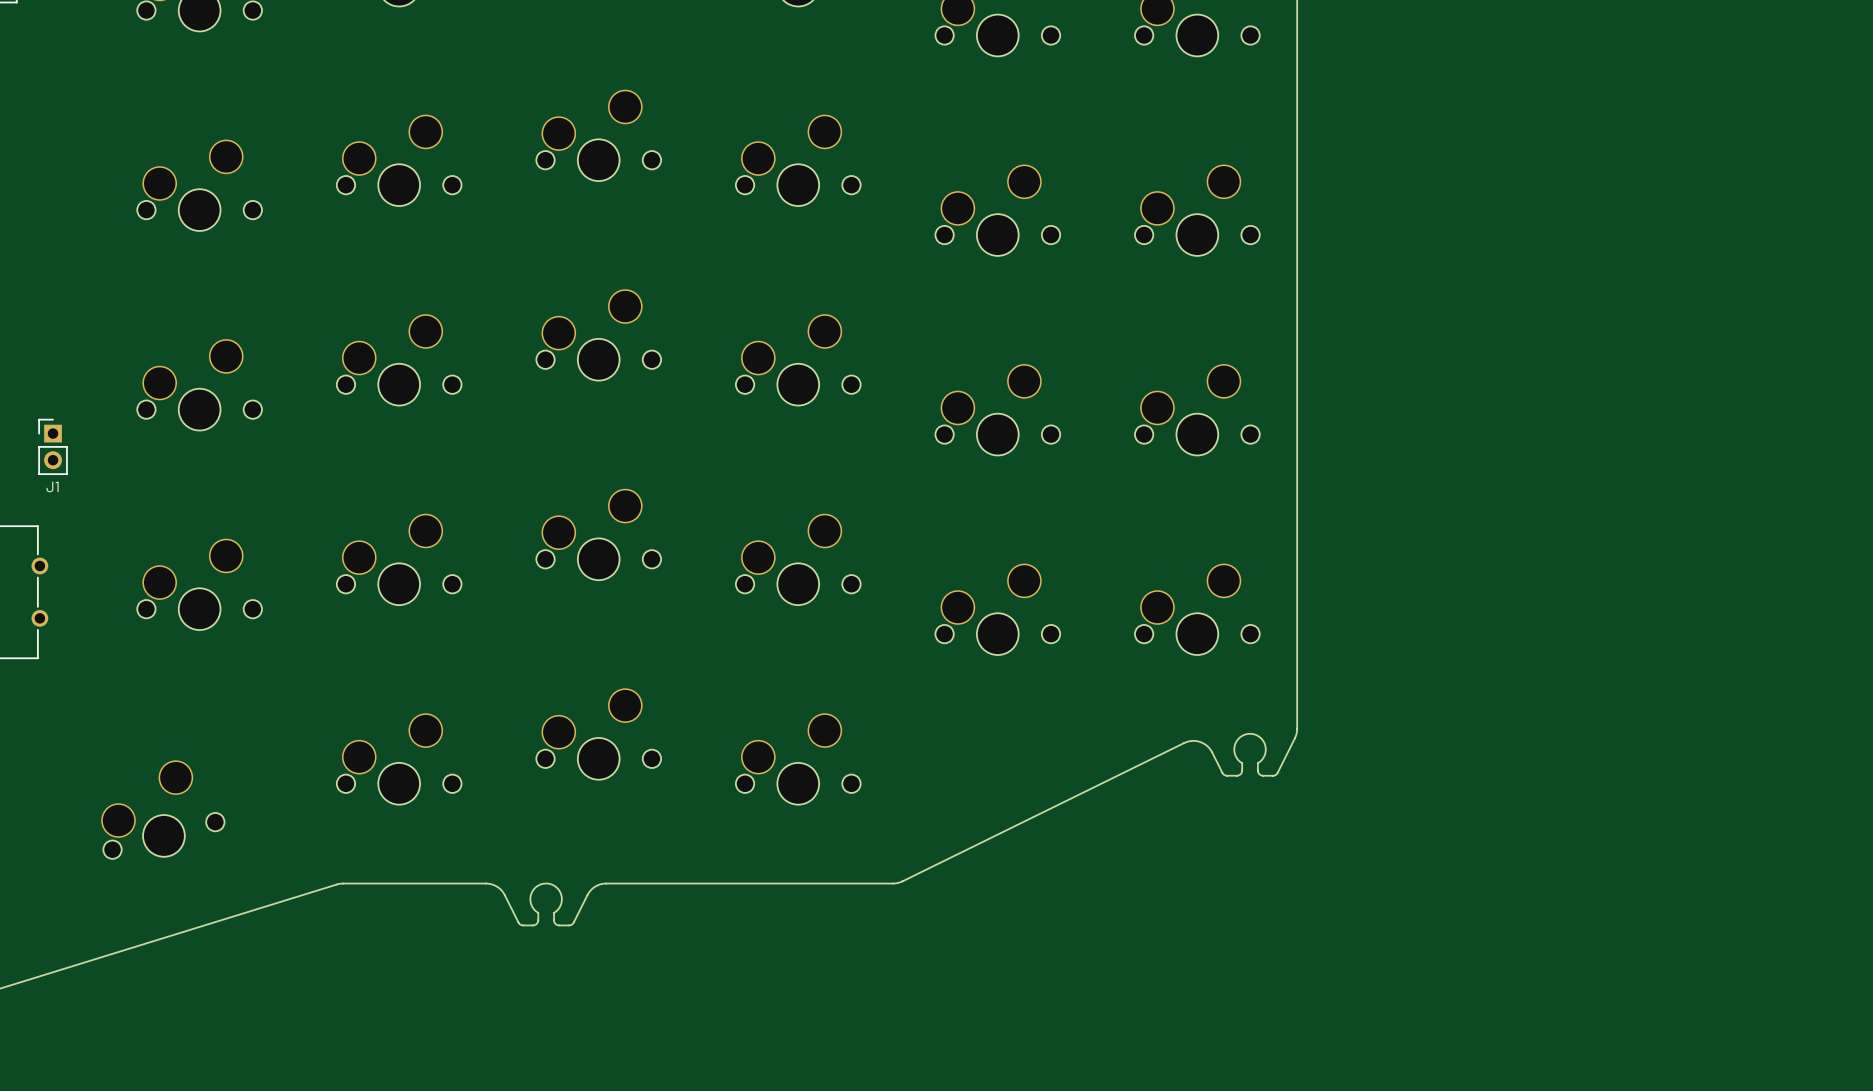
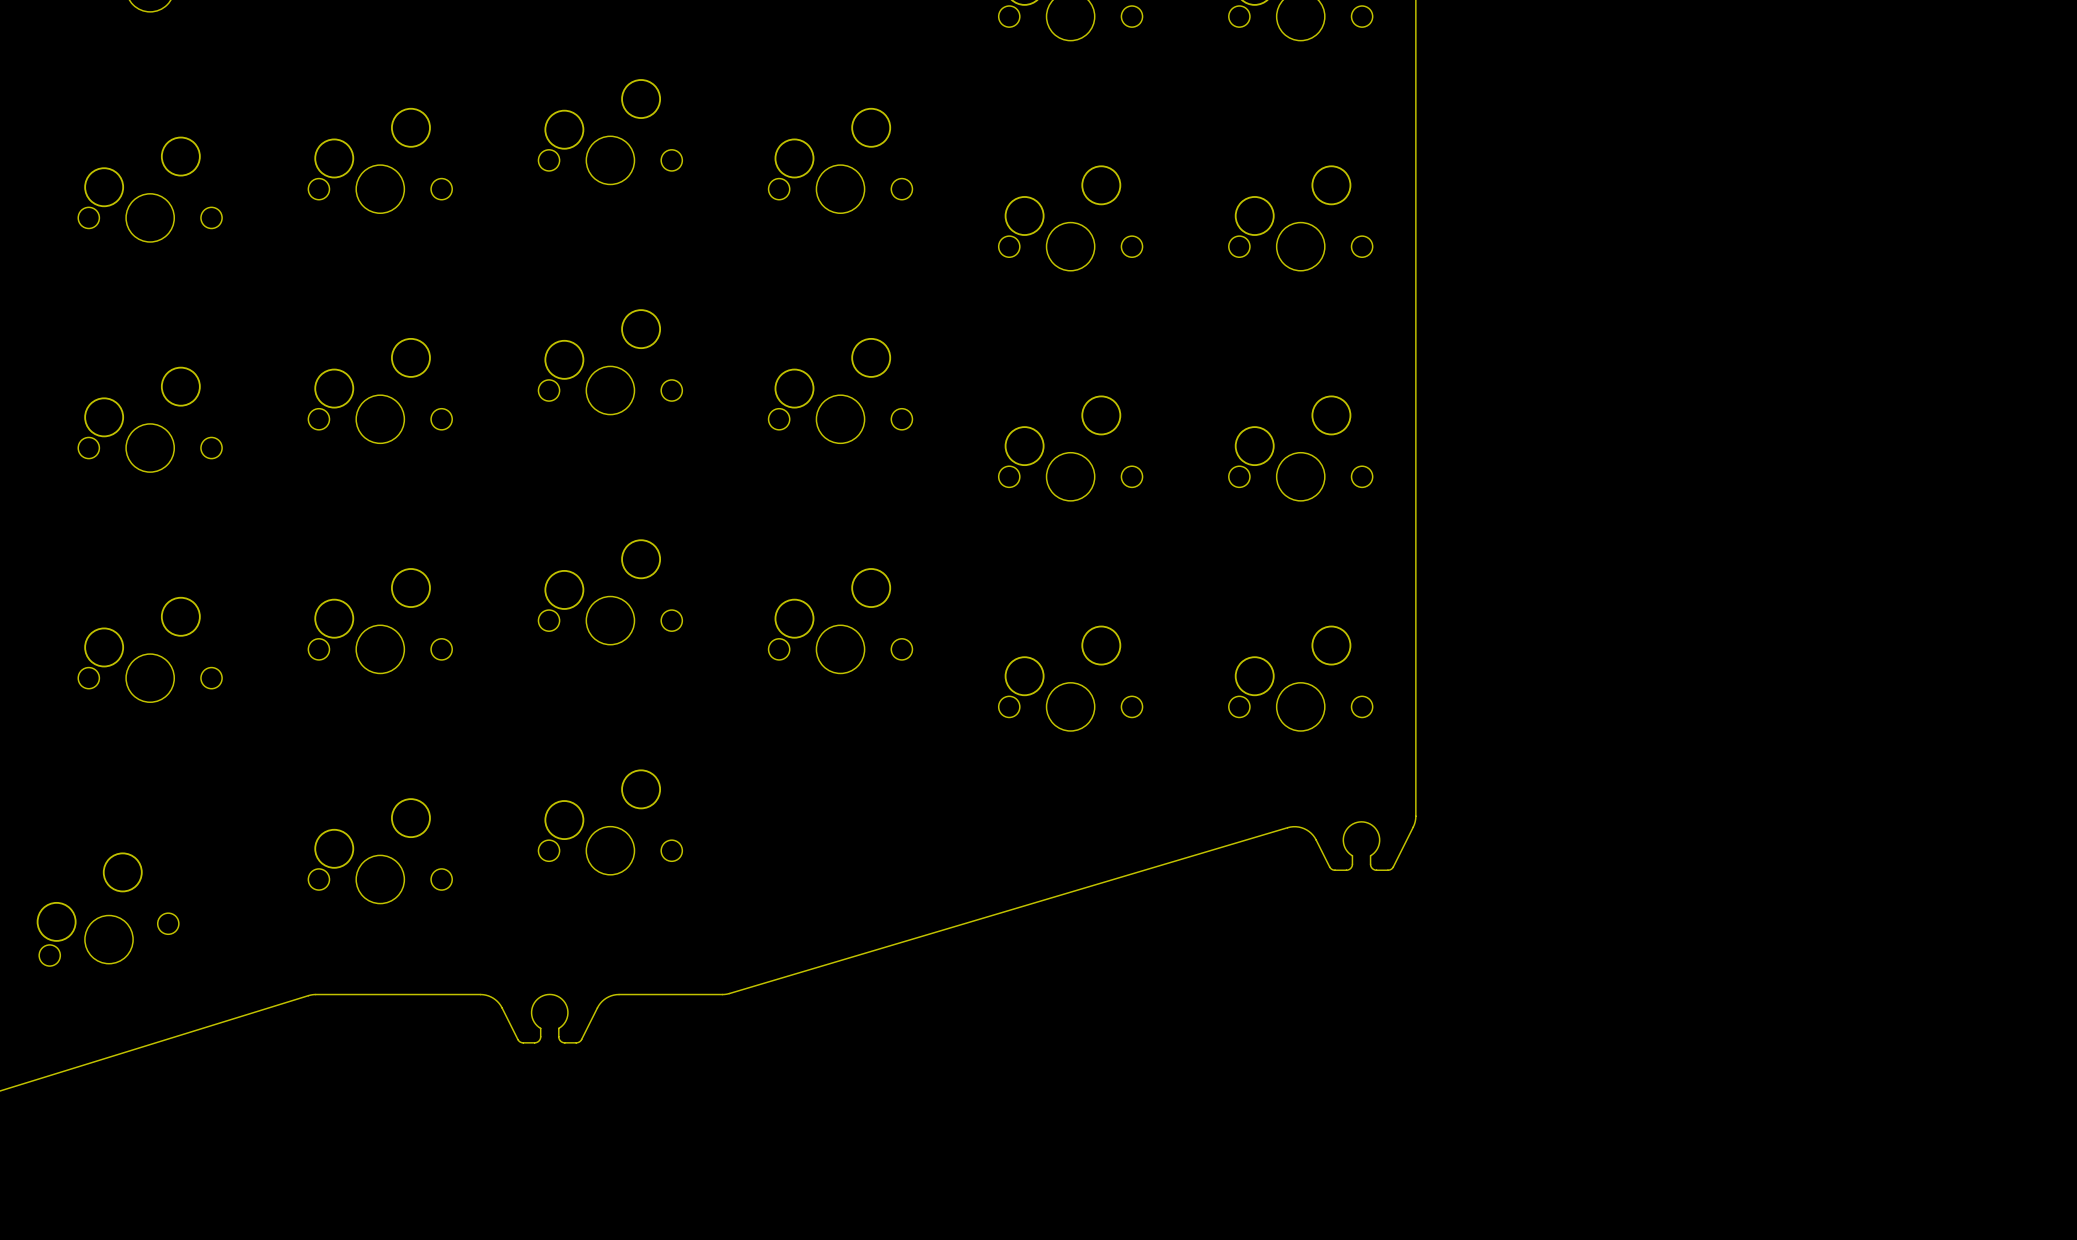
board edge: (1212, 752) (1207, 746) (1200, 741) (1192, 740) (1184, 743) (897, 882) (696, 883) -> (1317, 843) (1306, 829) (1296, 826) (1287, 827) (722, 994)
part: (798, 758) -> none

